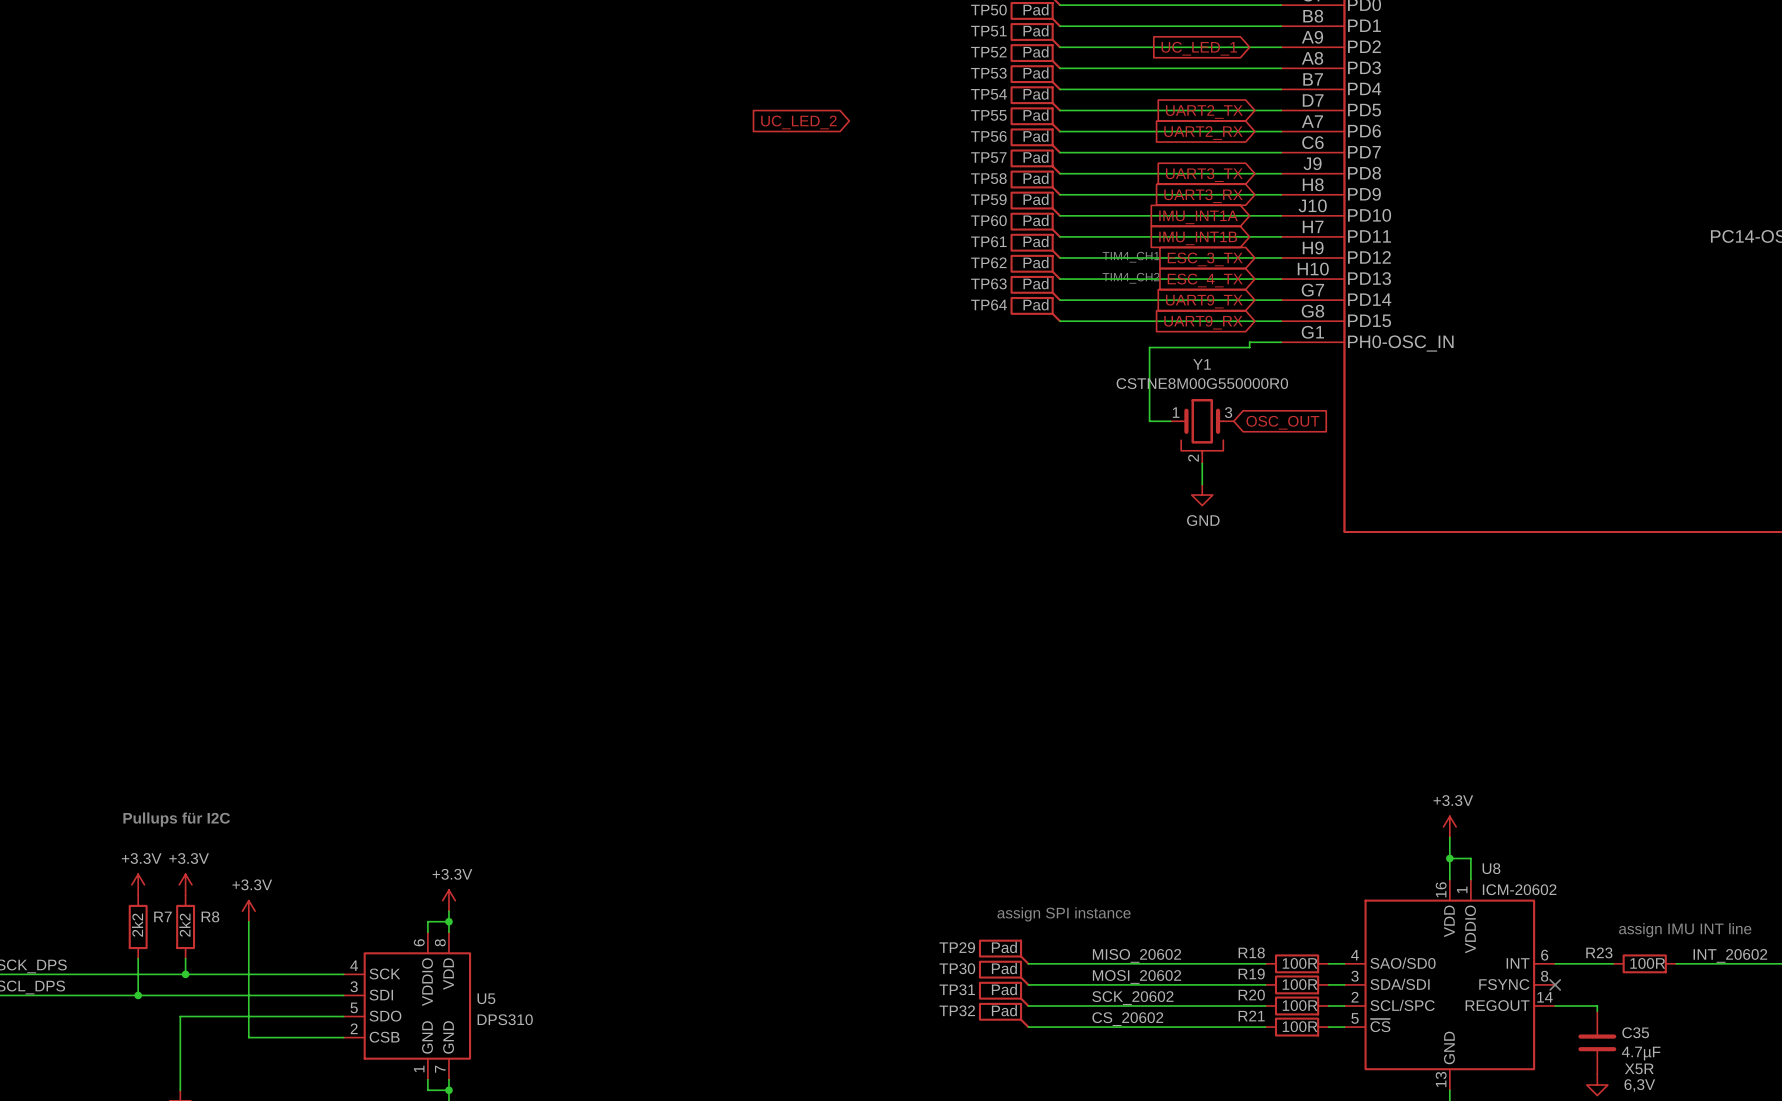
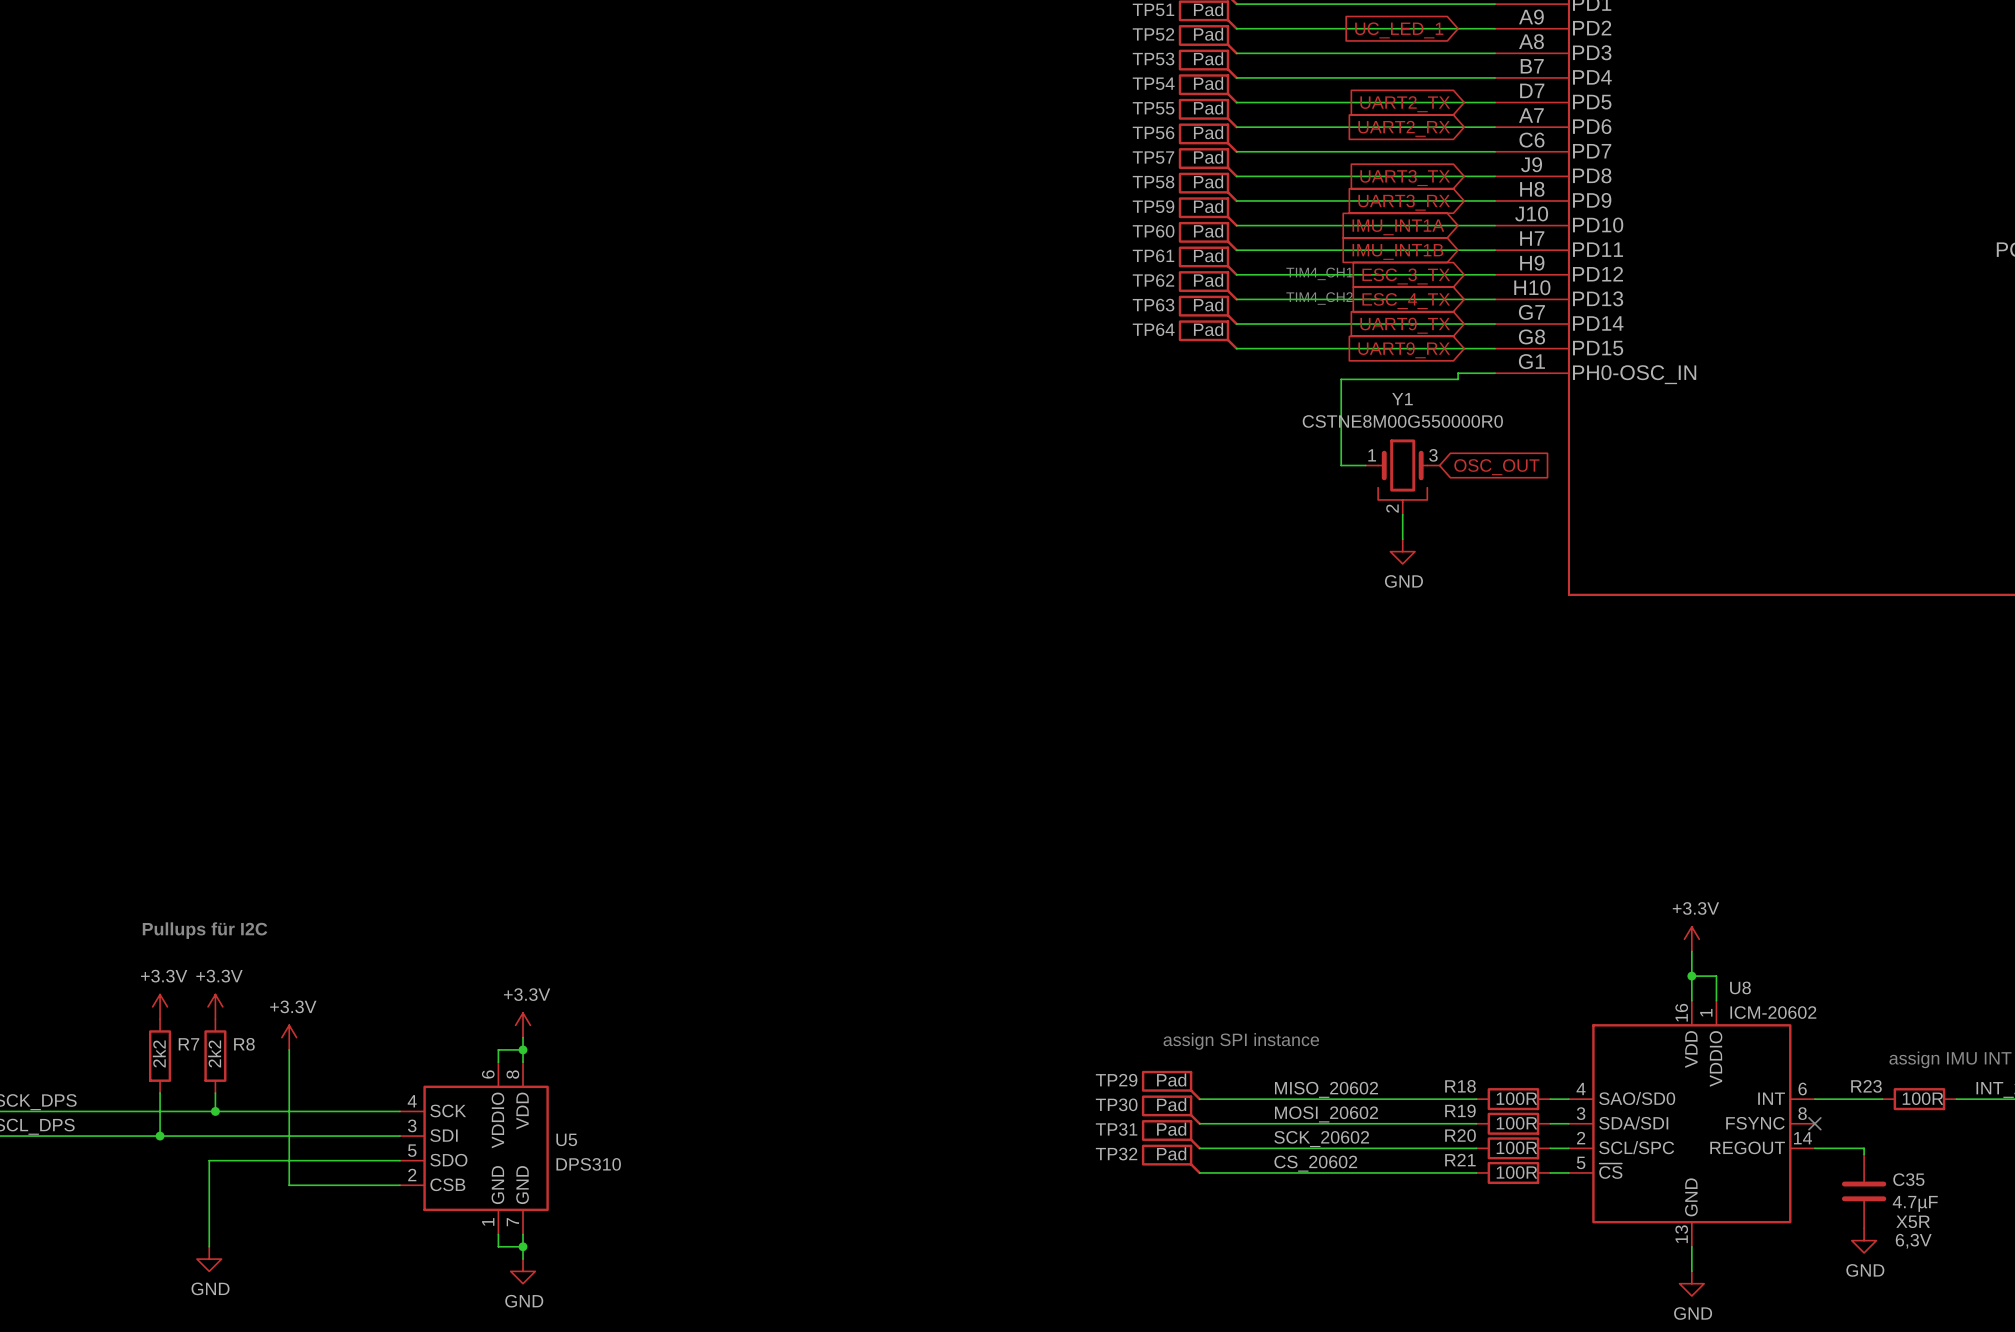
global label: UC_LED_2 (798, 122) -> none

